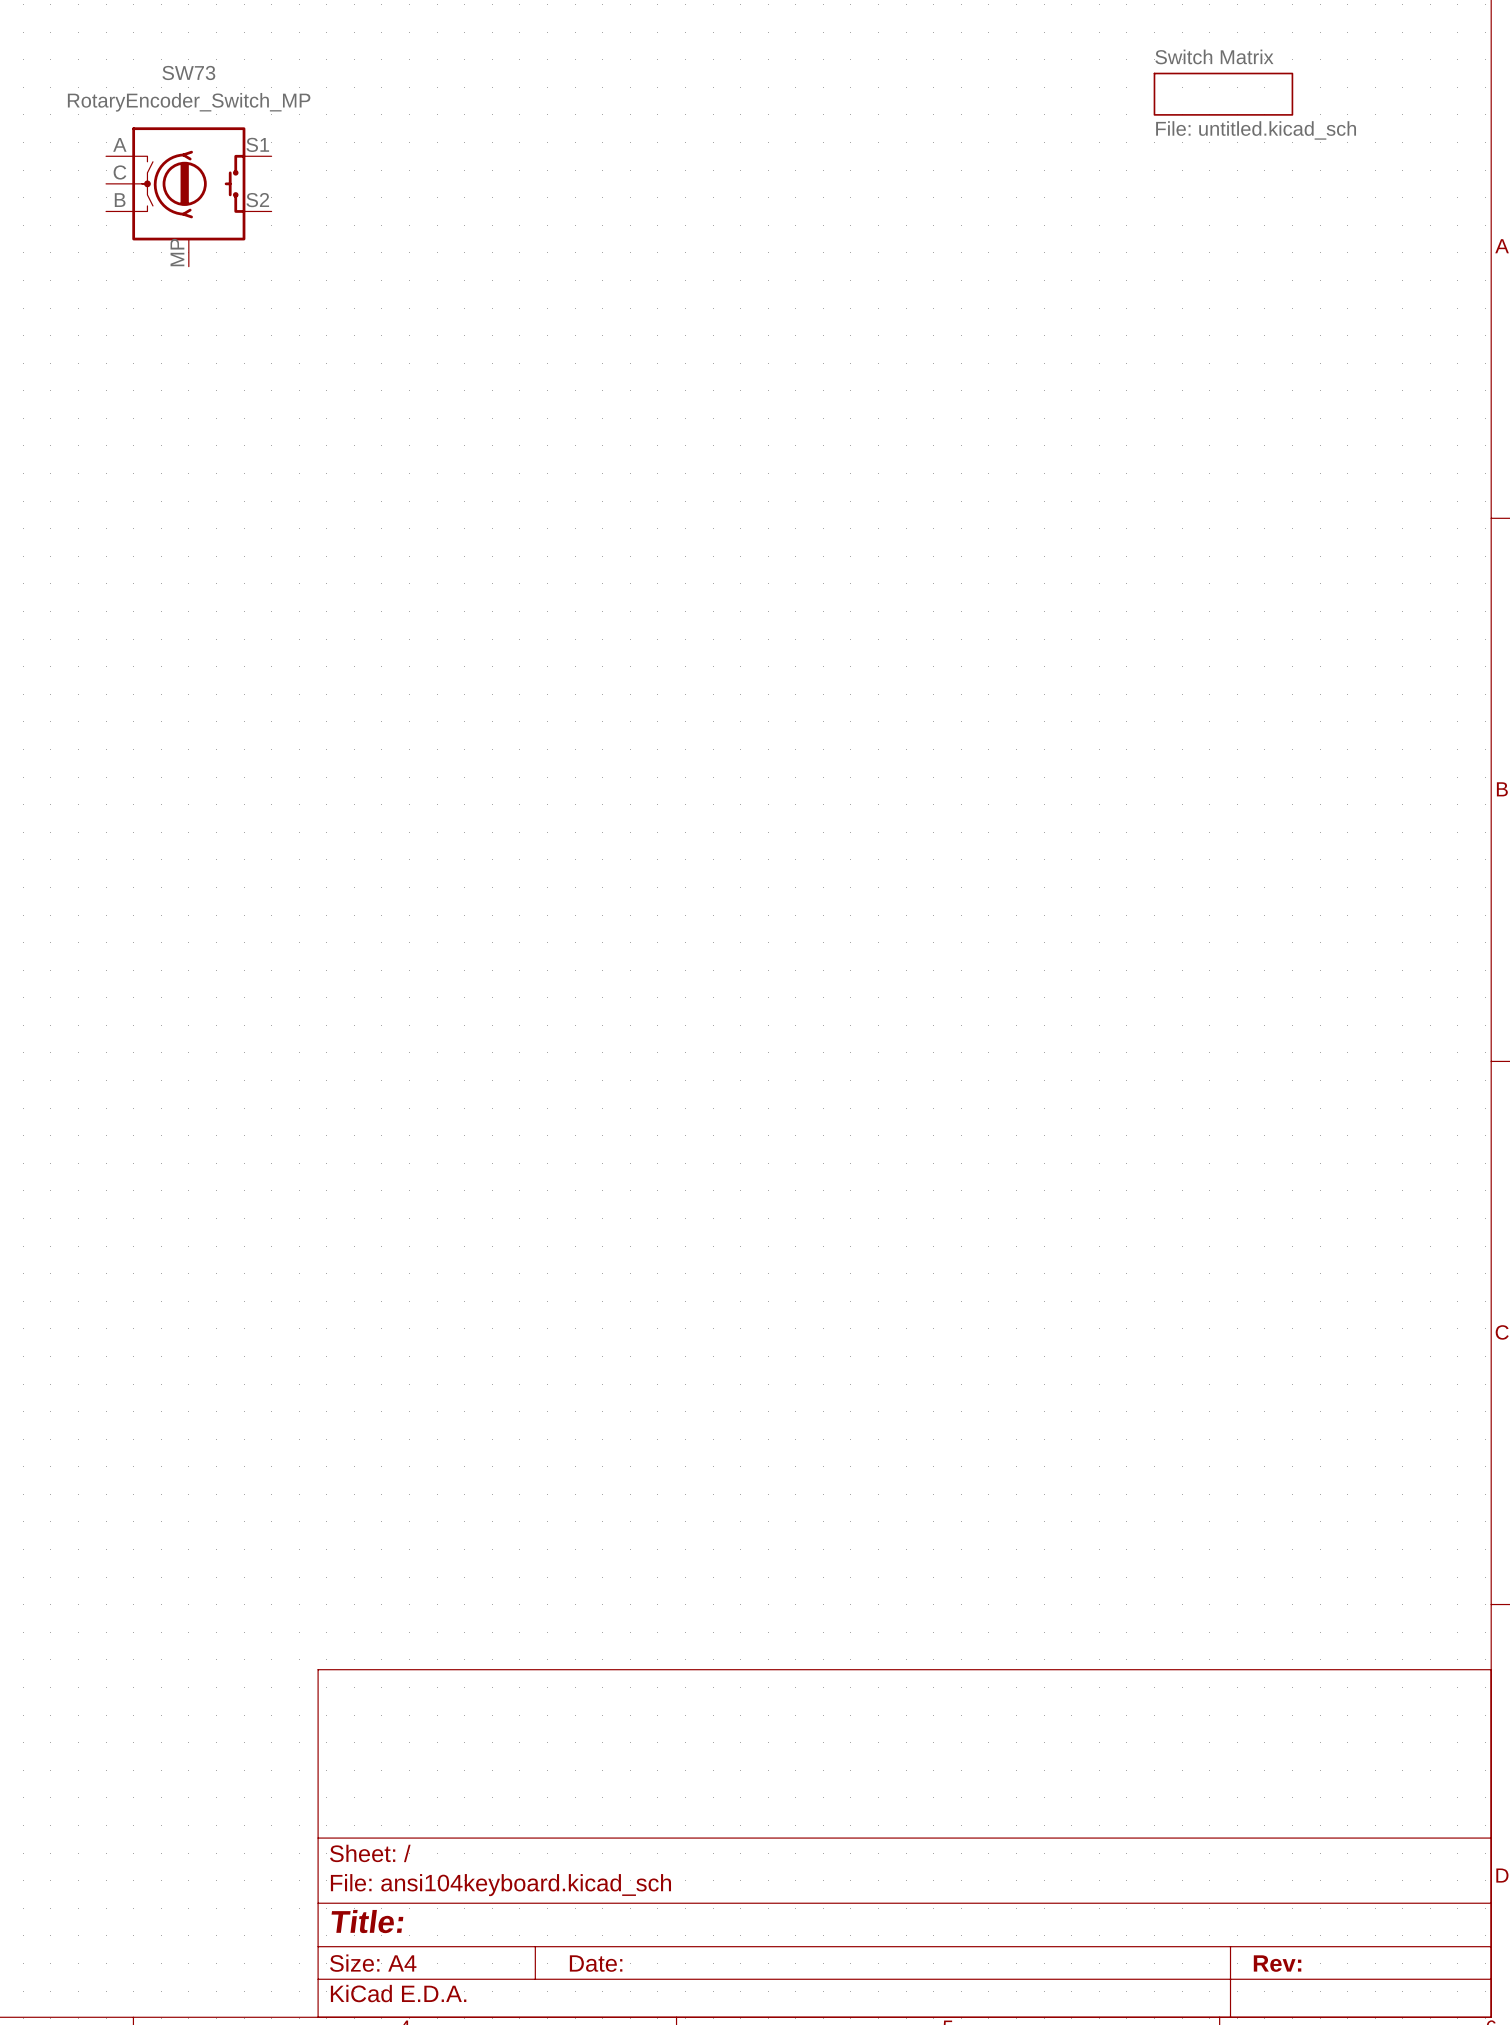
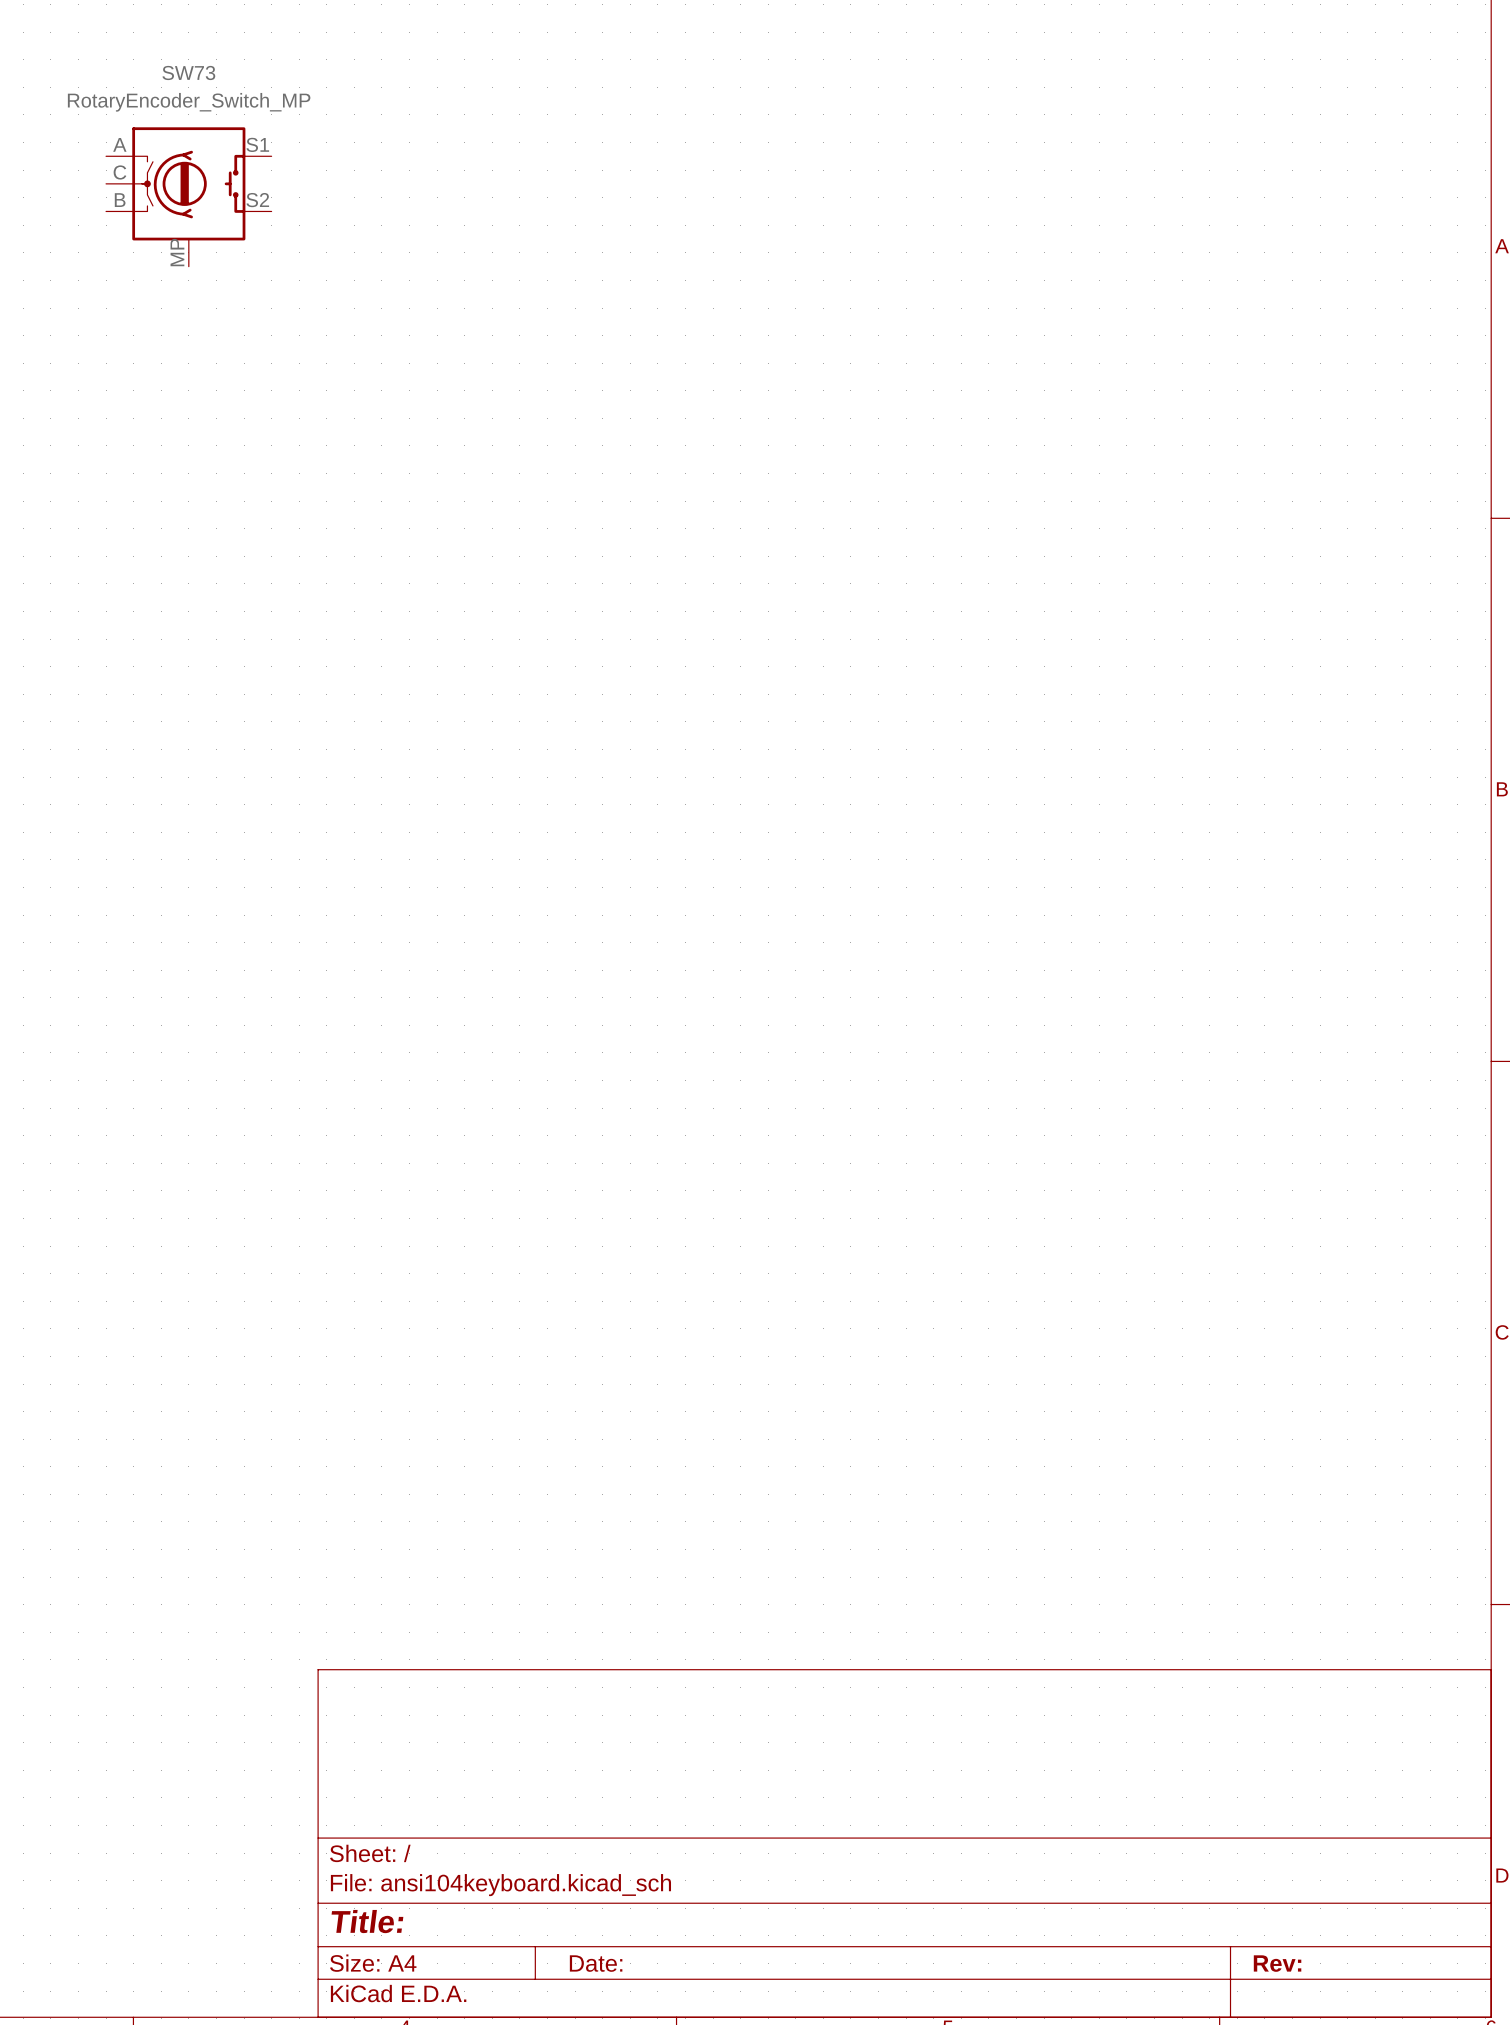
sheet Switch Matrix: File: untitled.kicad_sch (1223, 94) -> none

